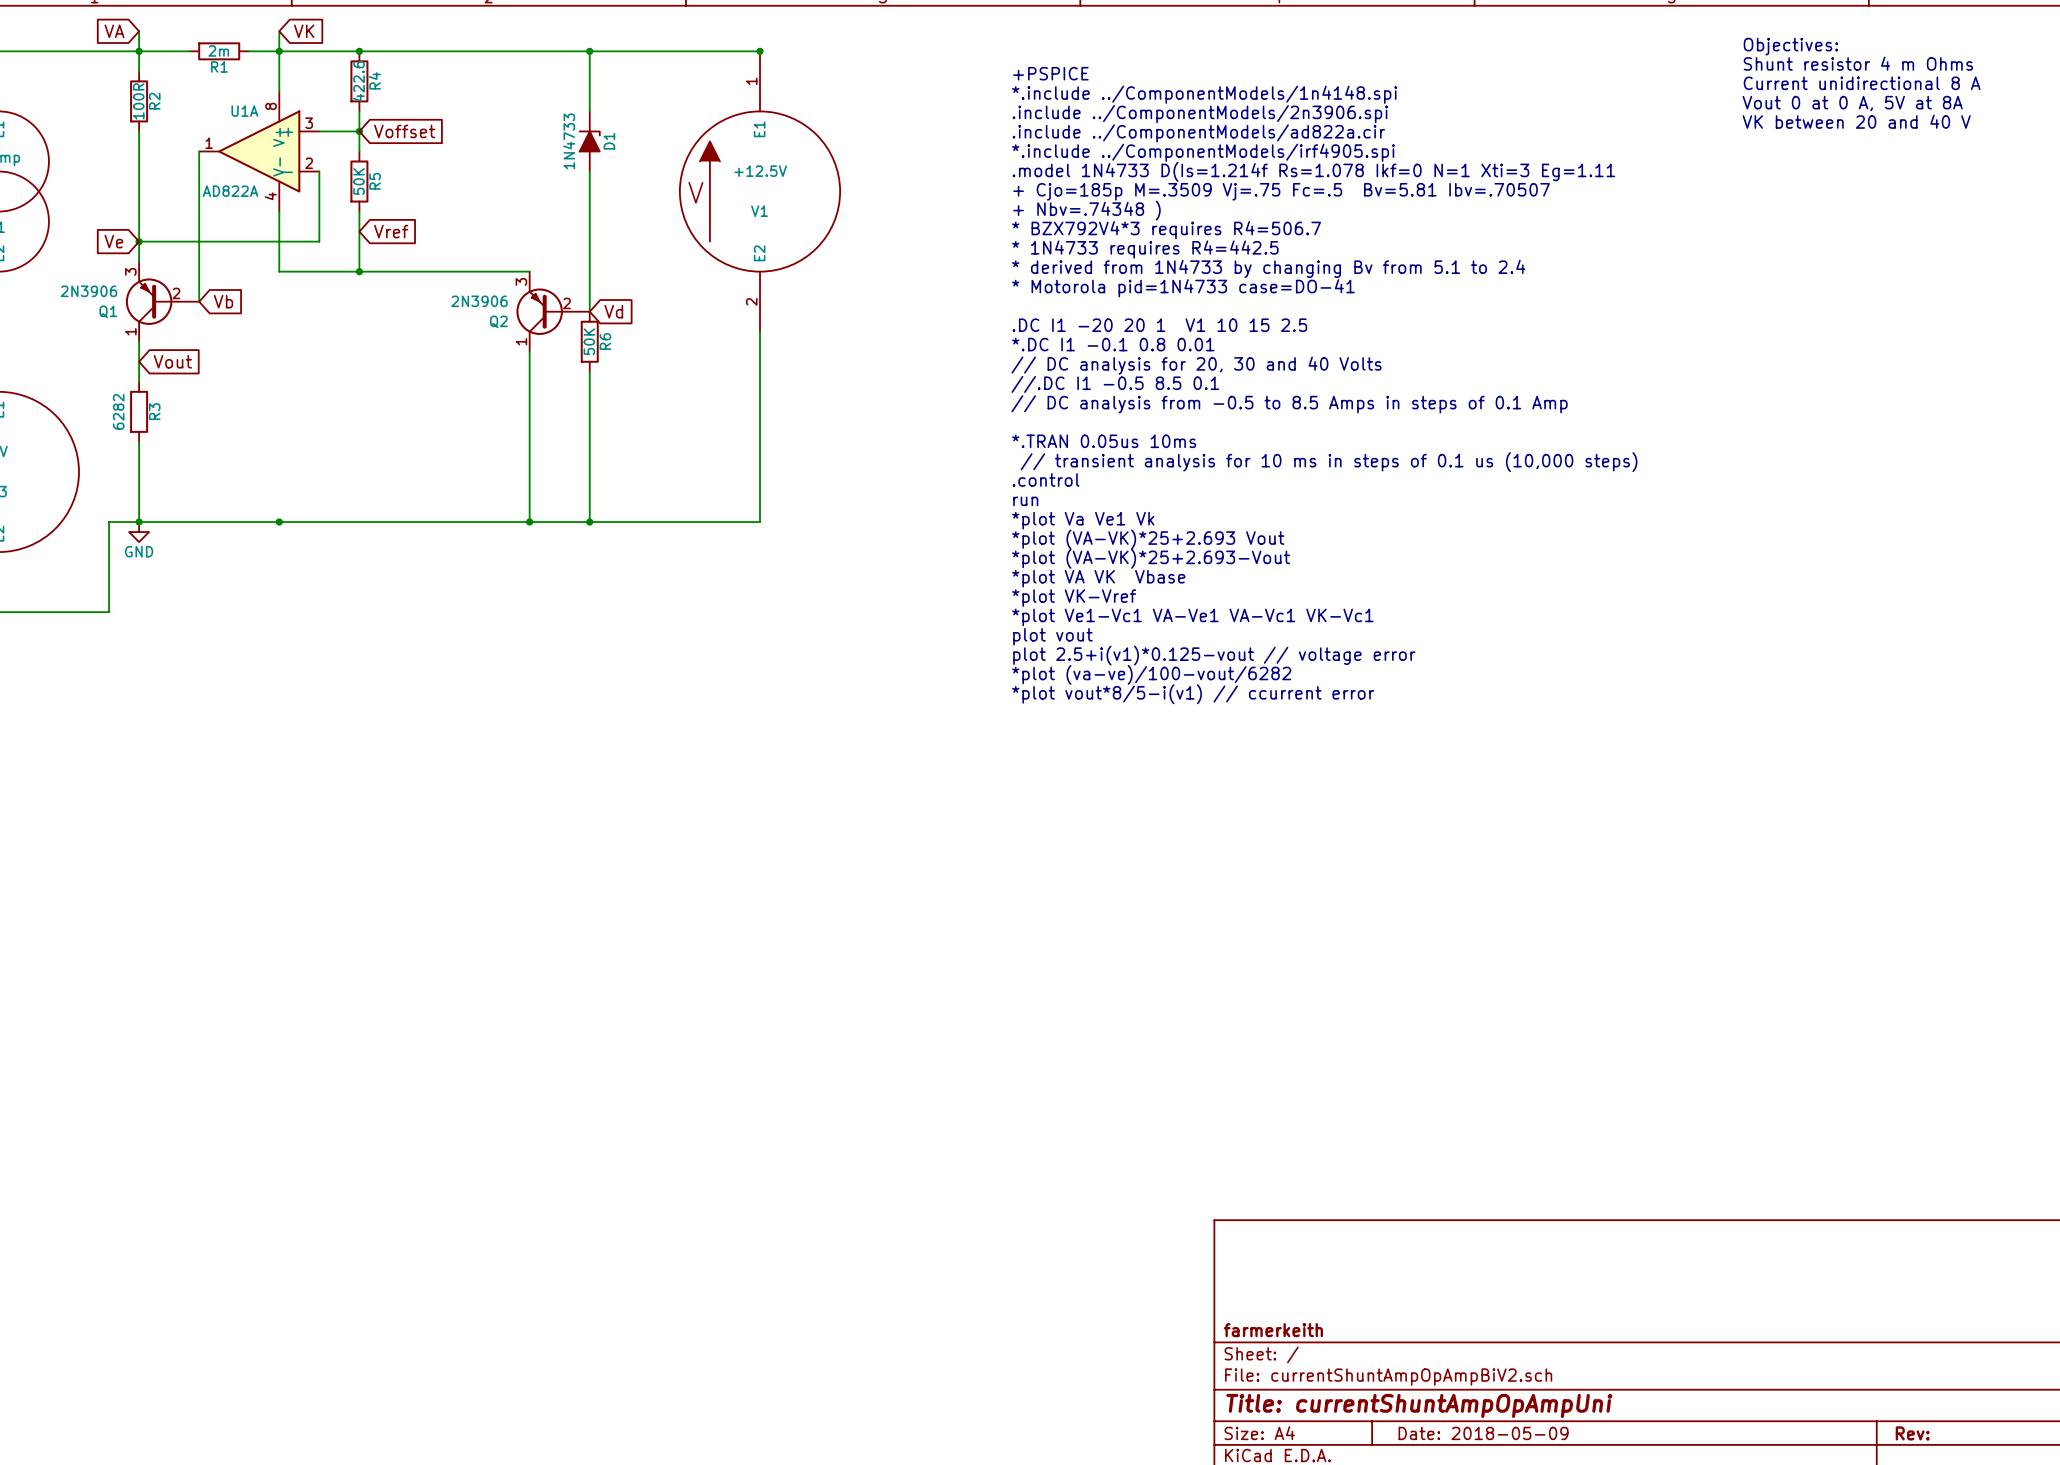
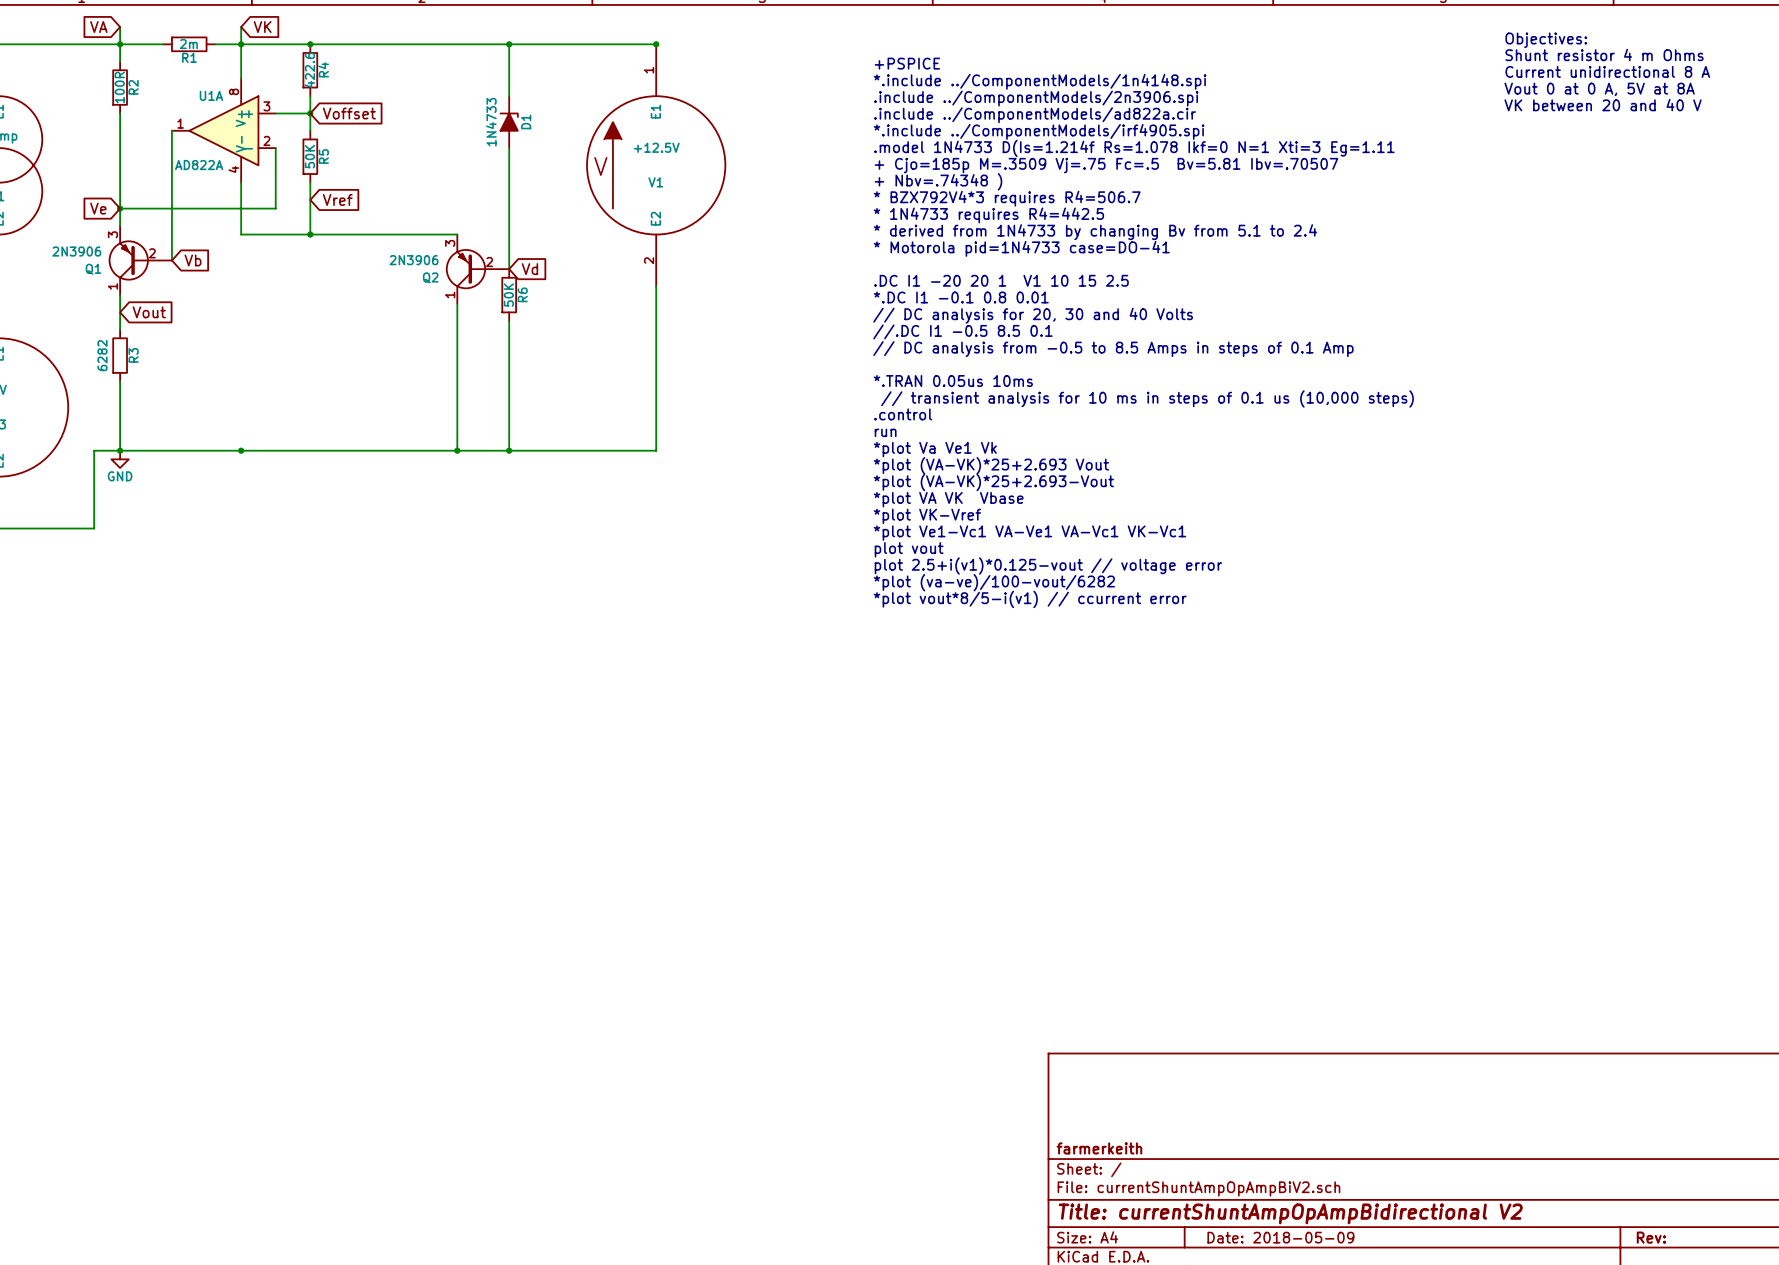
title block: Title: currentShuntAmpOpAmpUni (1419, 1405) -> Title: currentShuntAmpOpAmpBidirectional V2 (1290, 1213)

